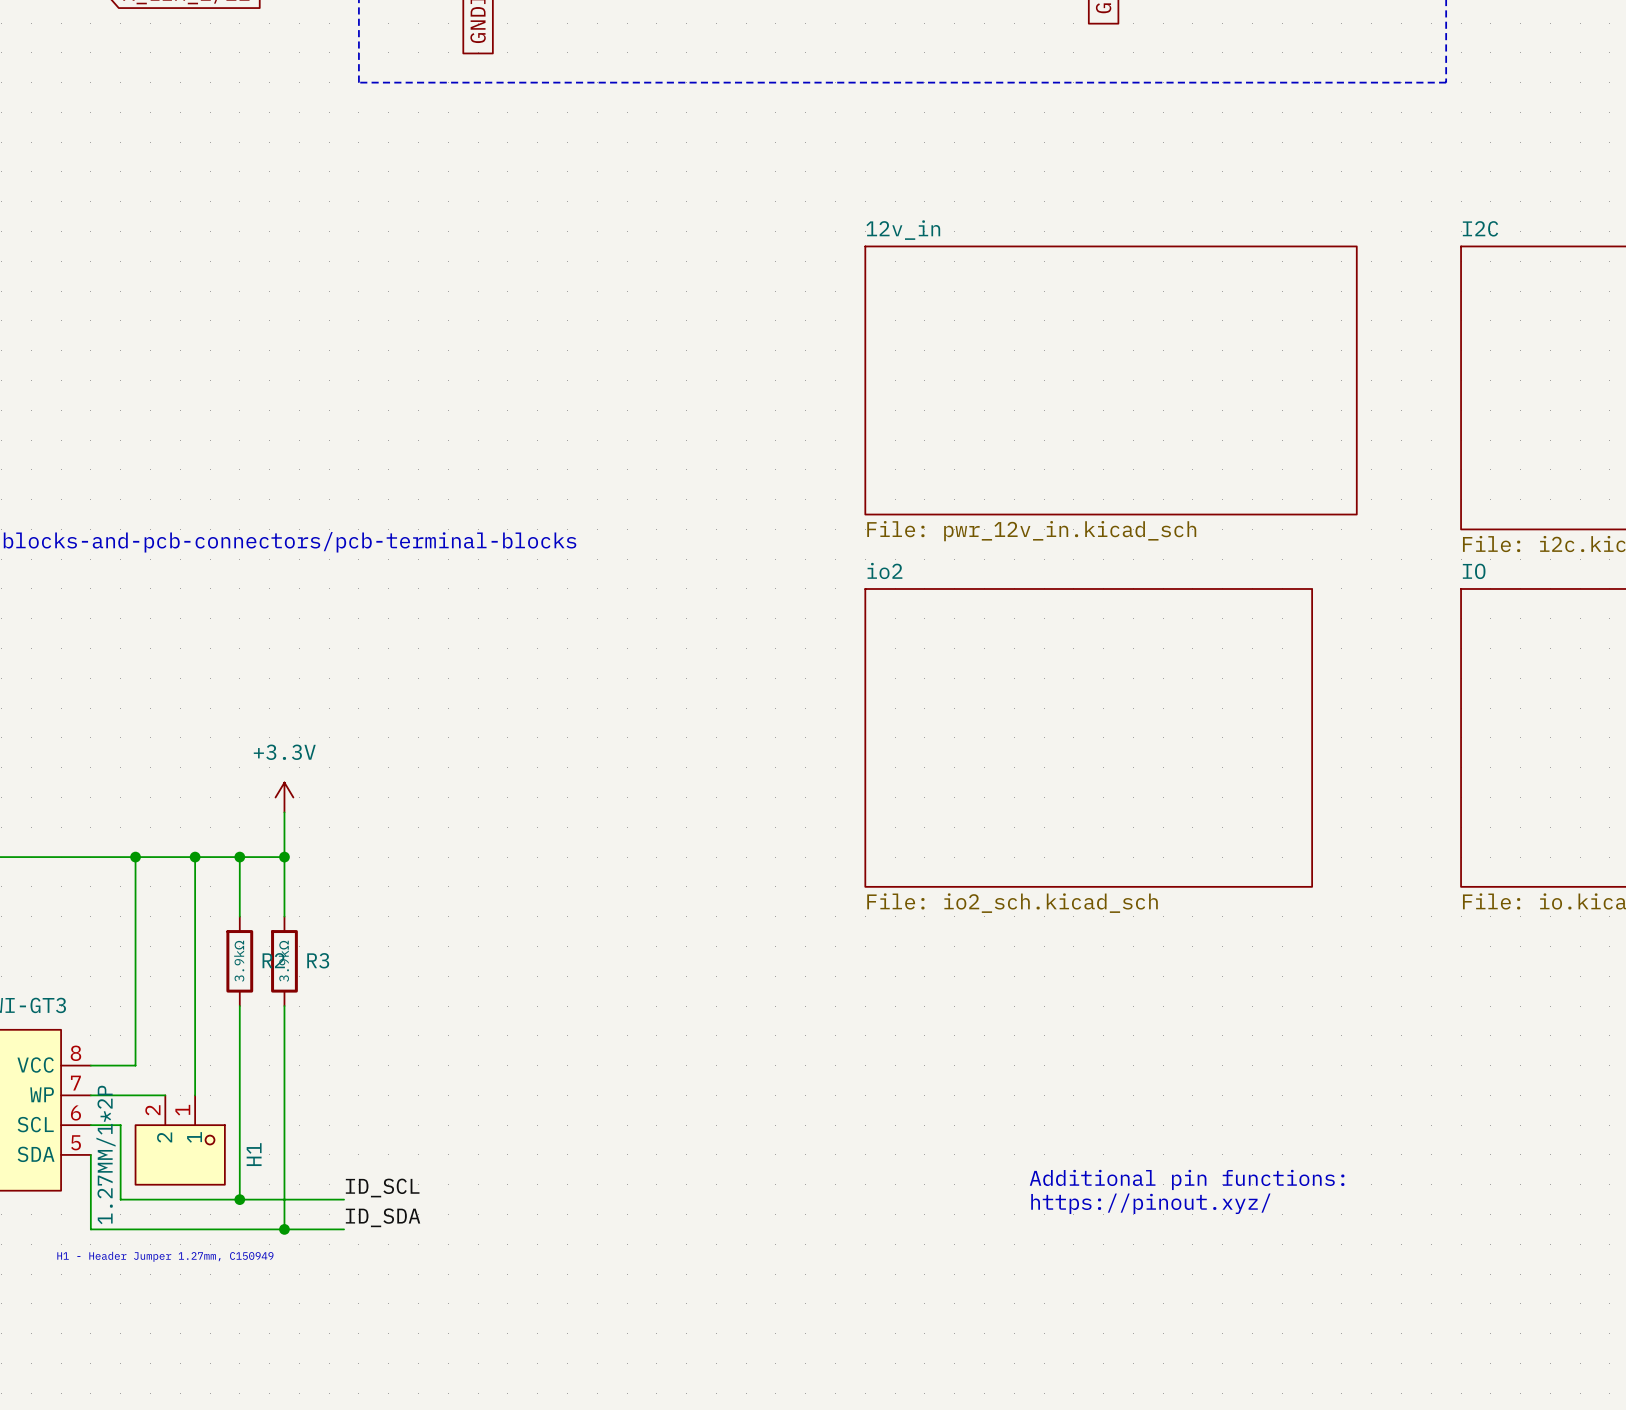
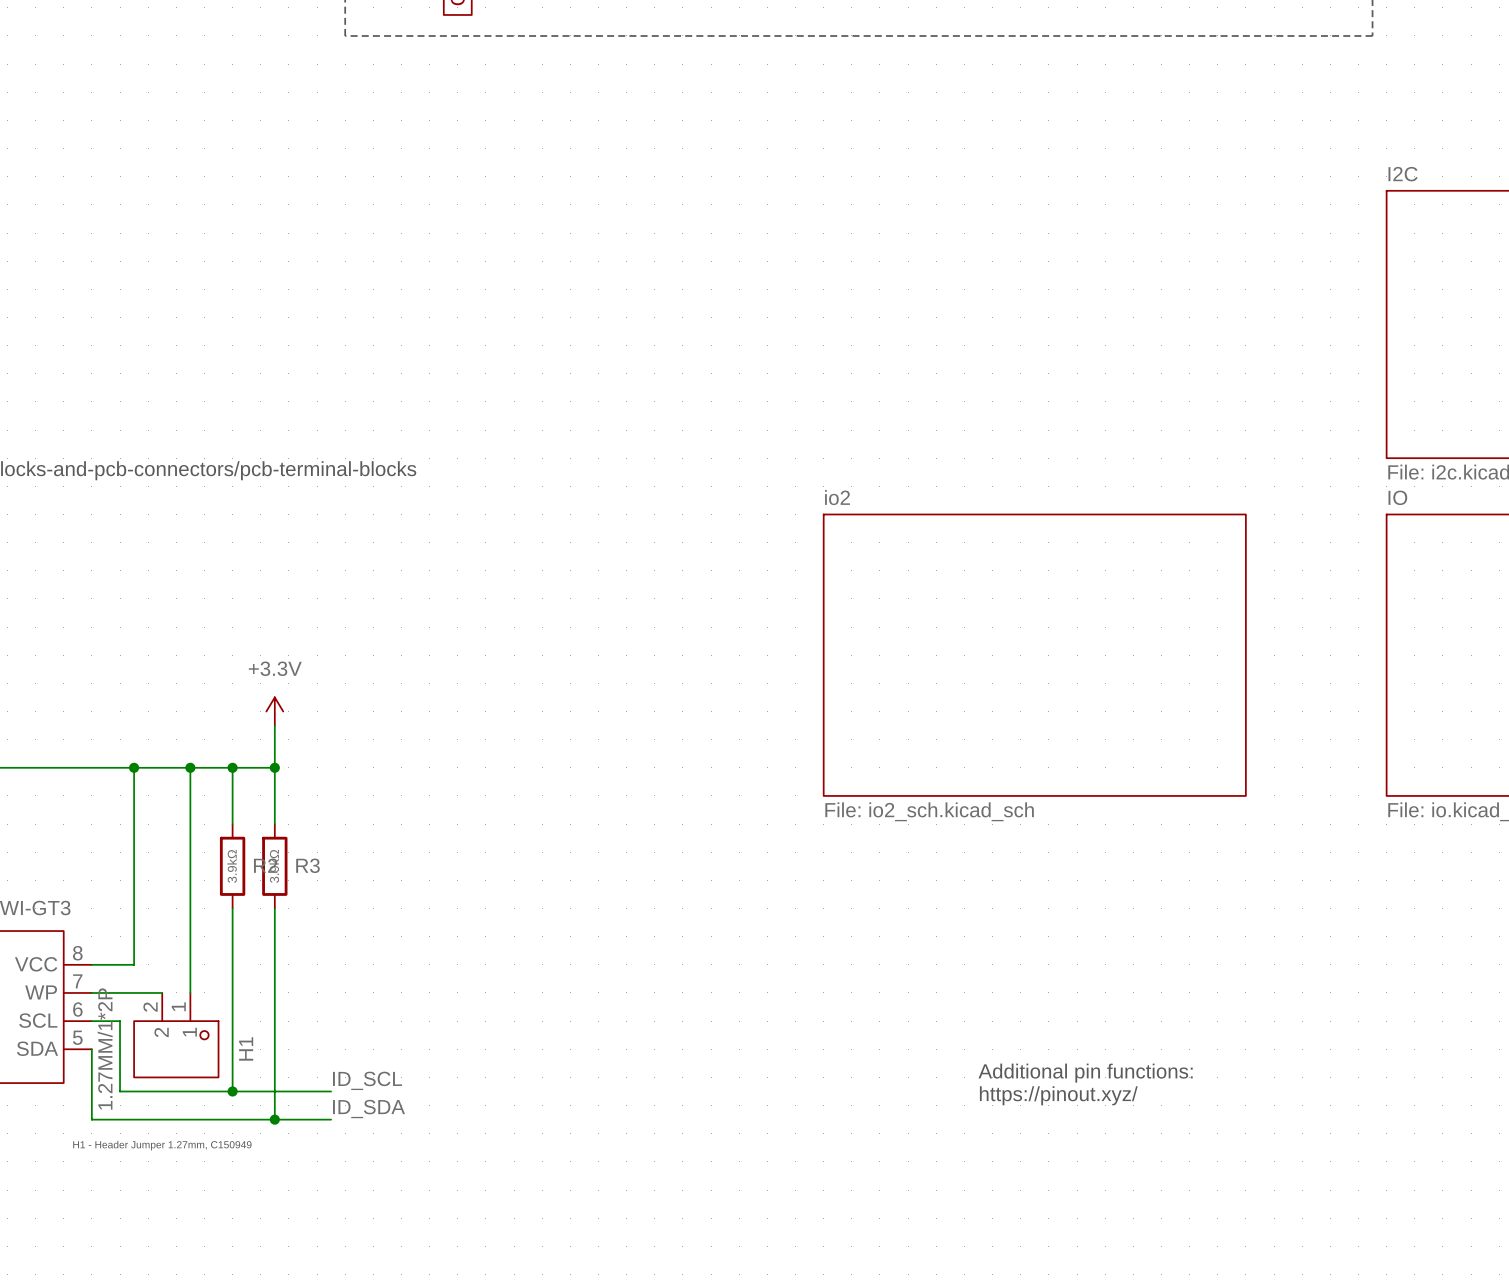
sheet 12v_in: File: pwr_12v_in.kicad_sch (1111, 380) -> none

